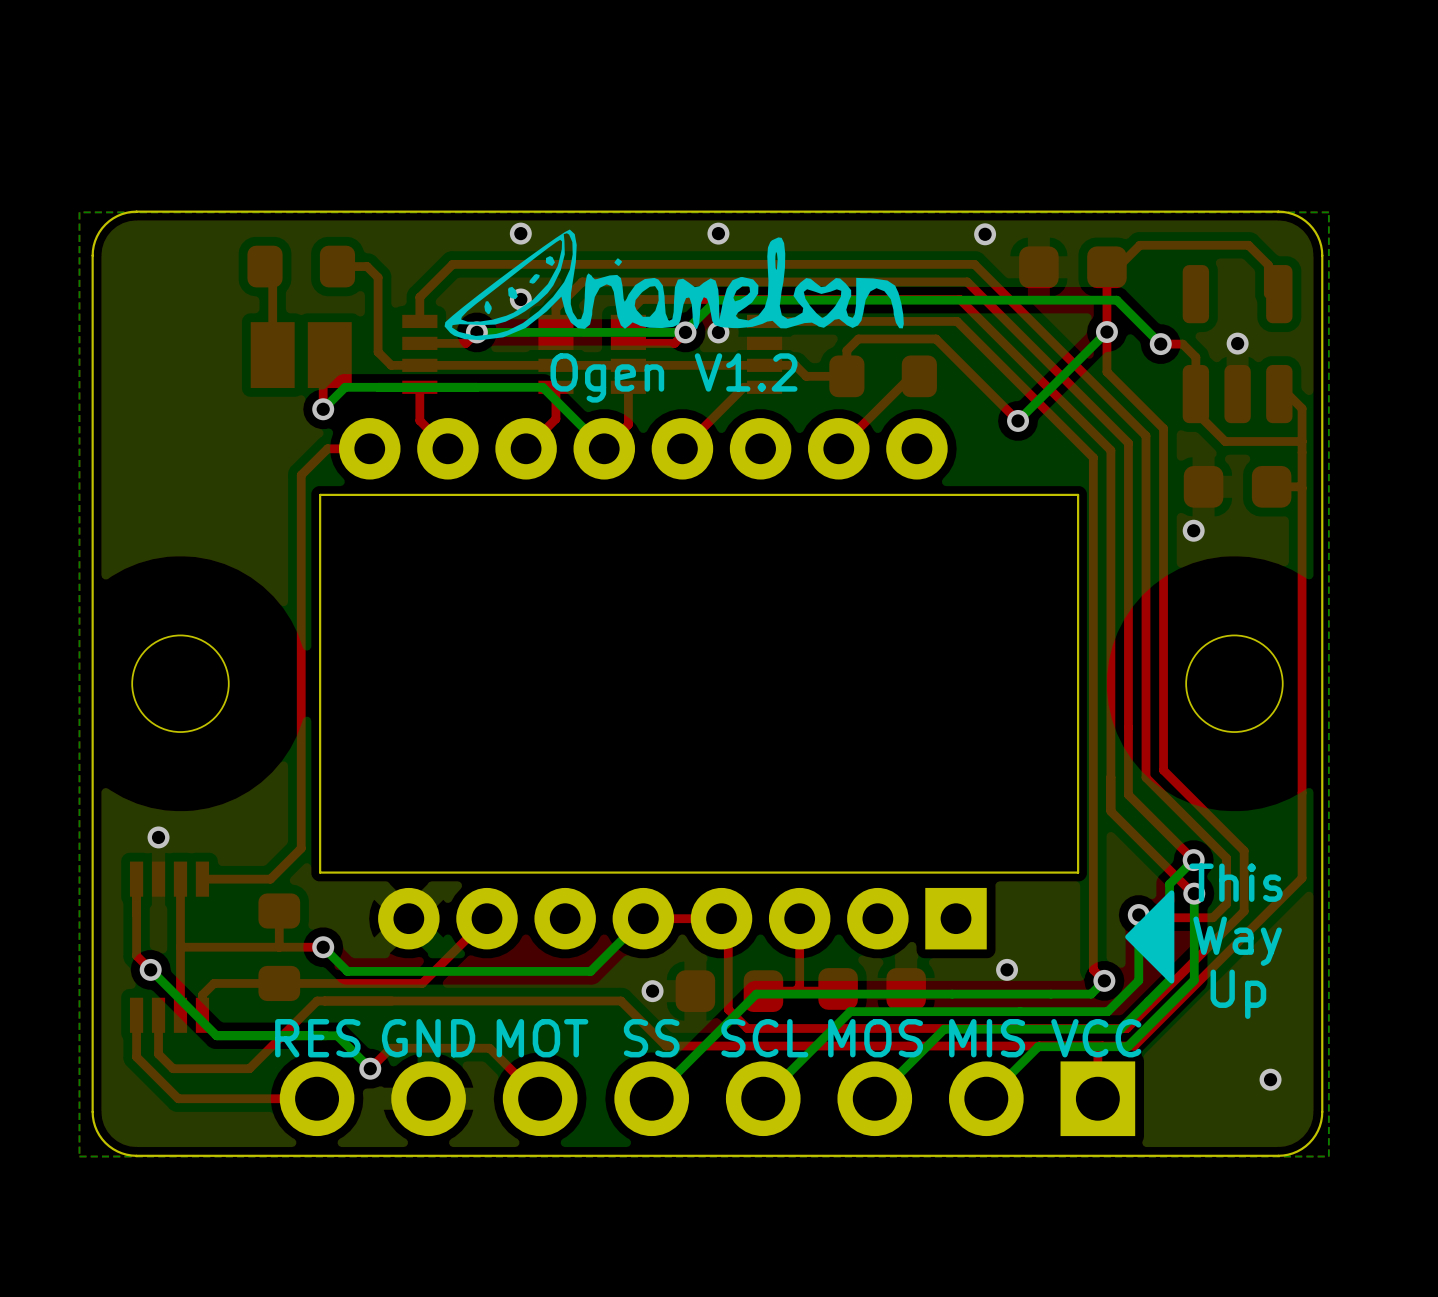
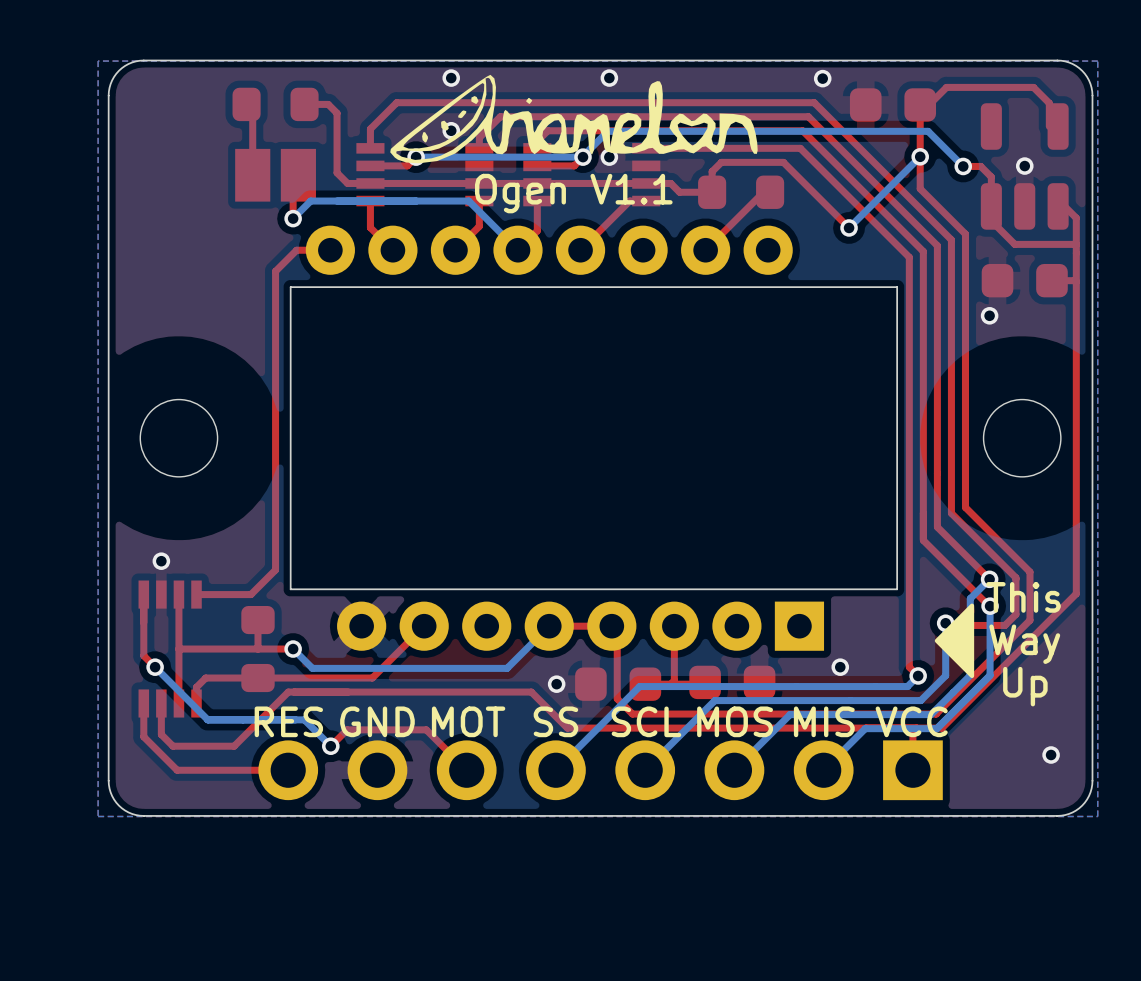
text: Ogen V1.2 (673, 377) -> Ogen V1.1 (573, 193)

